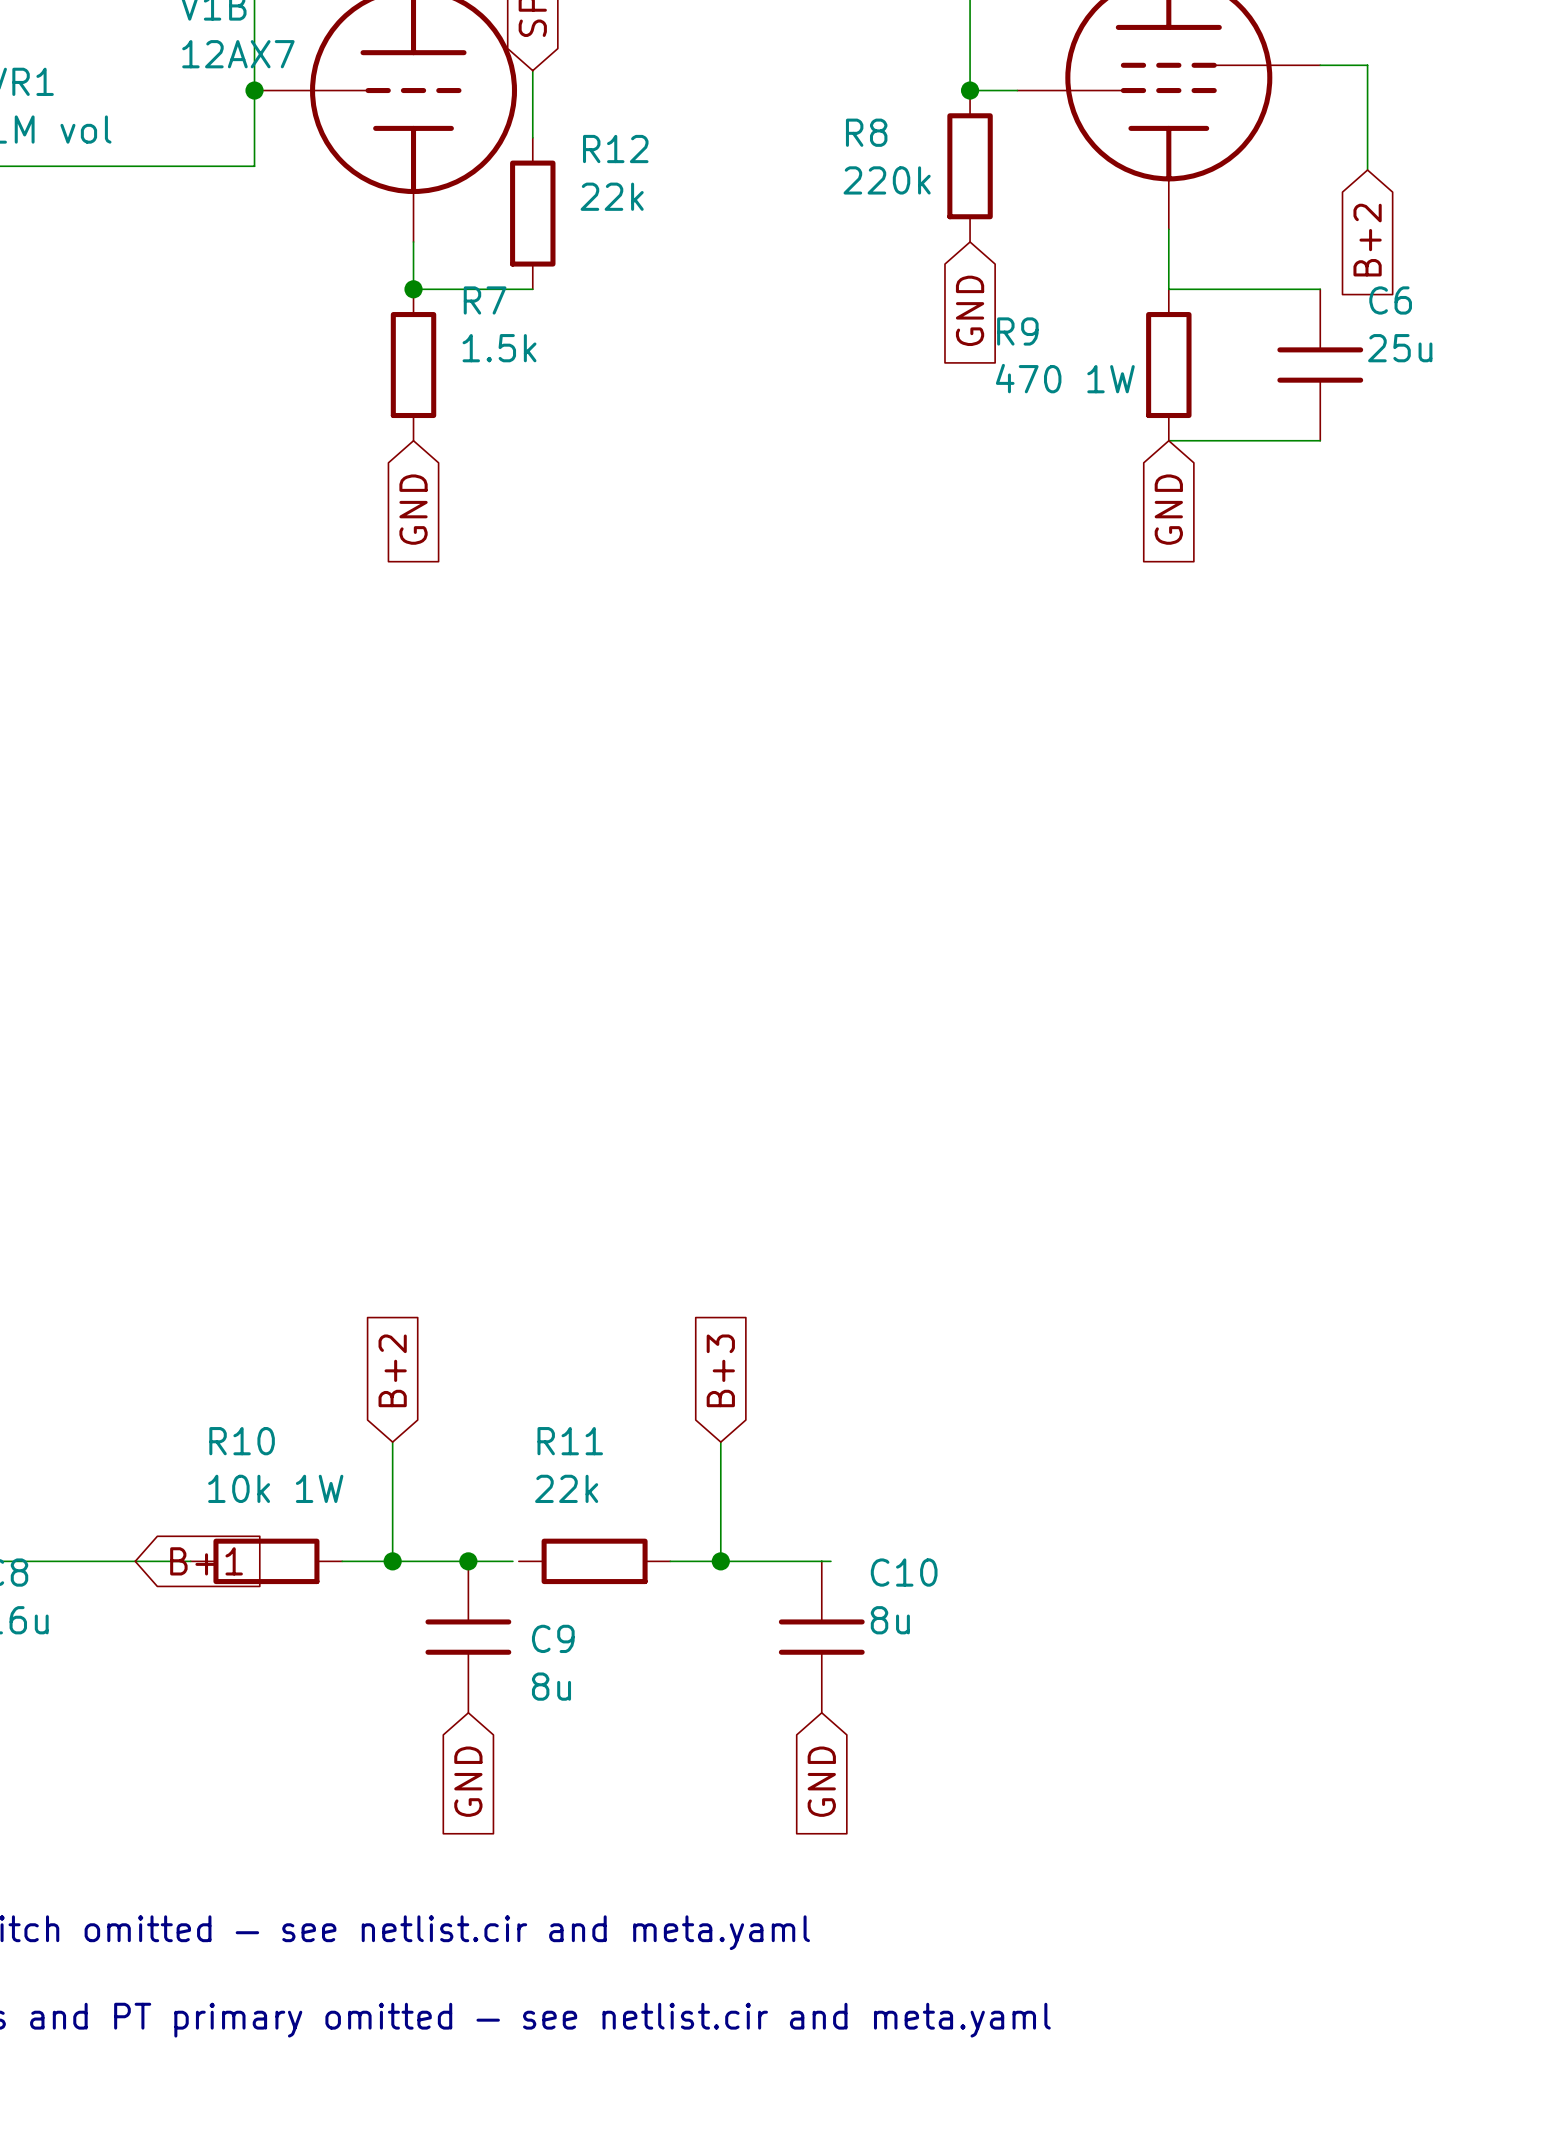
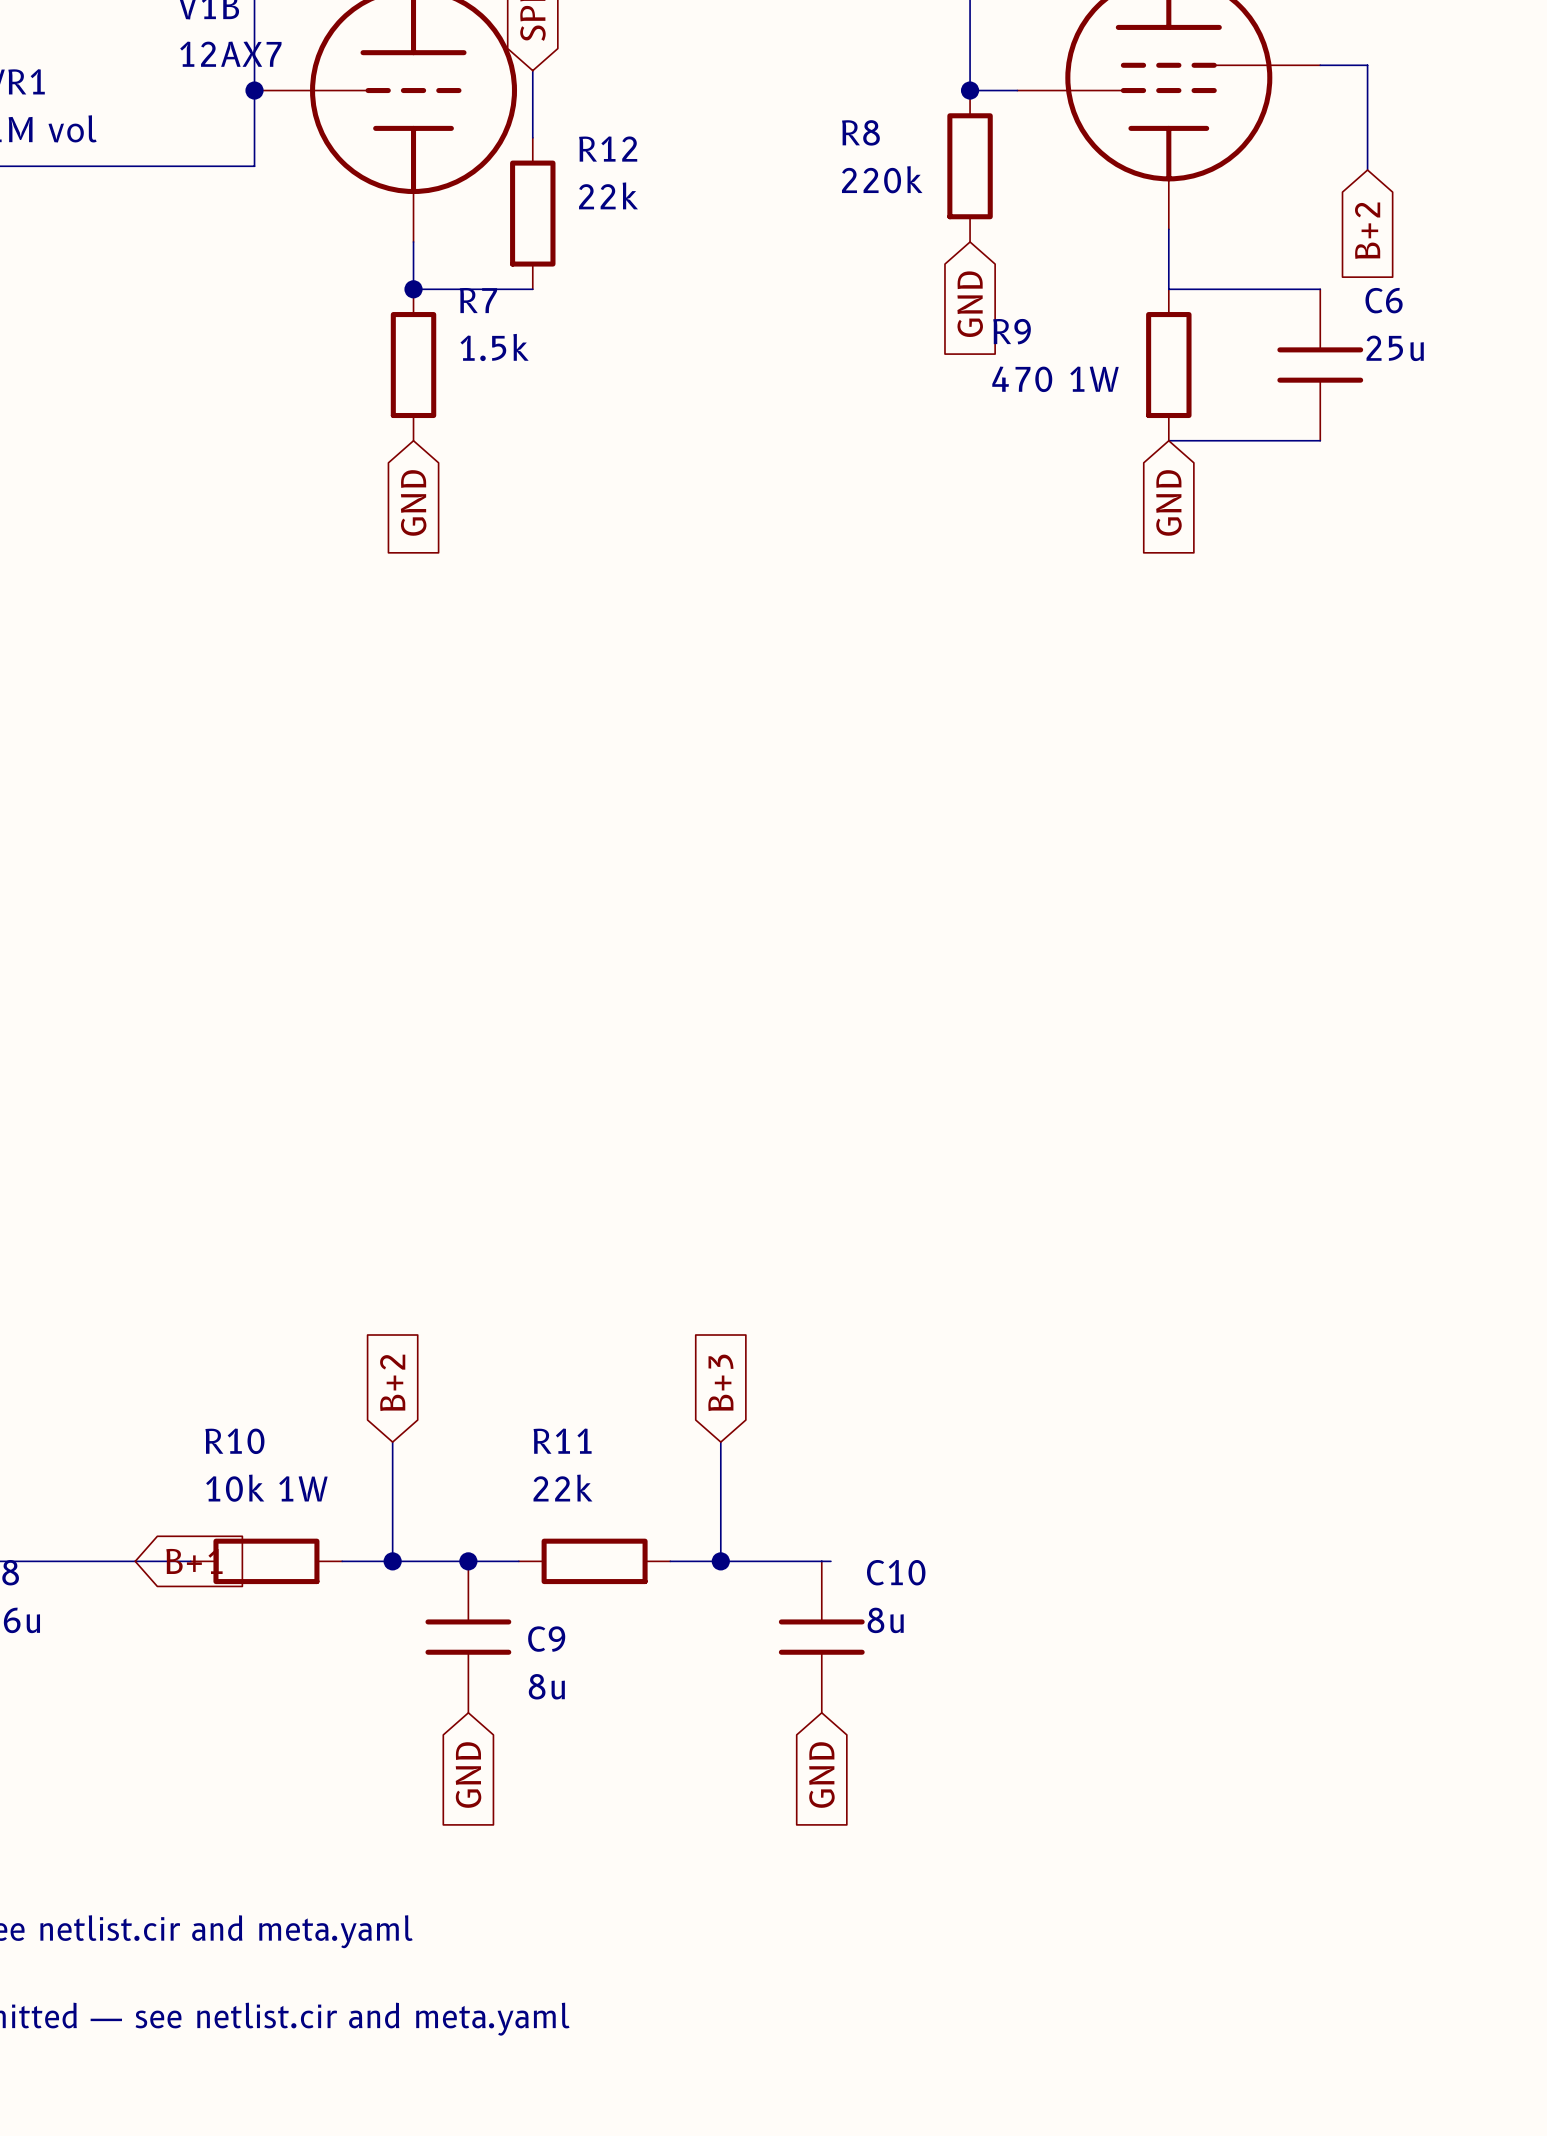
wire: none -> (512, 1561) (518, 1561)

